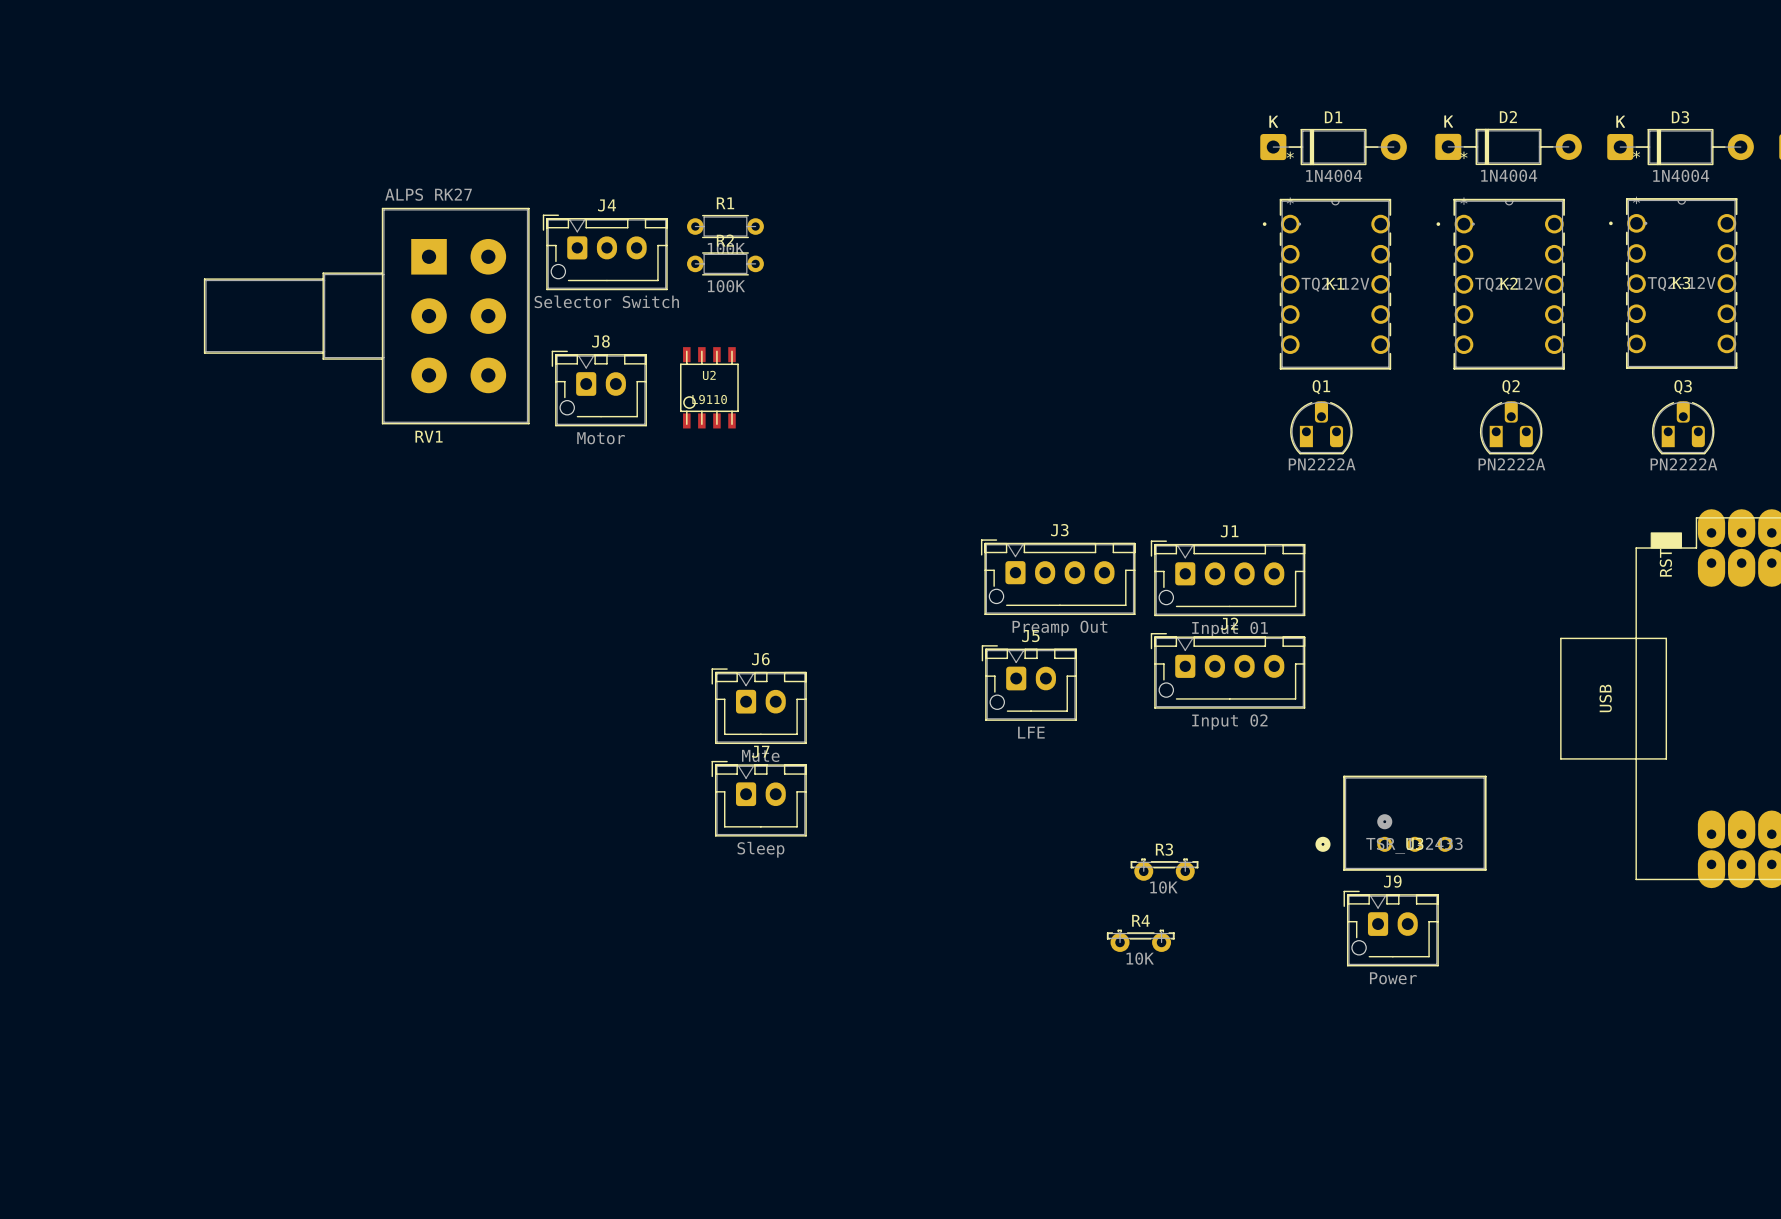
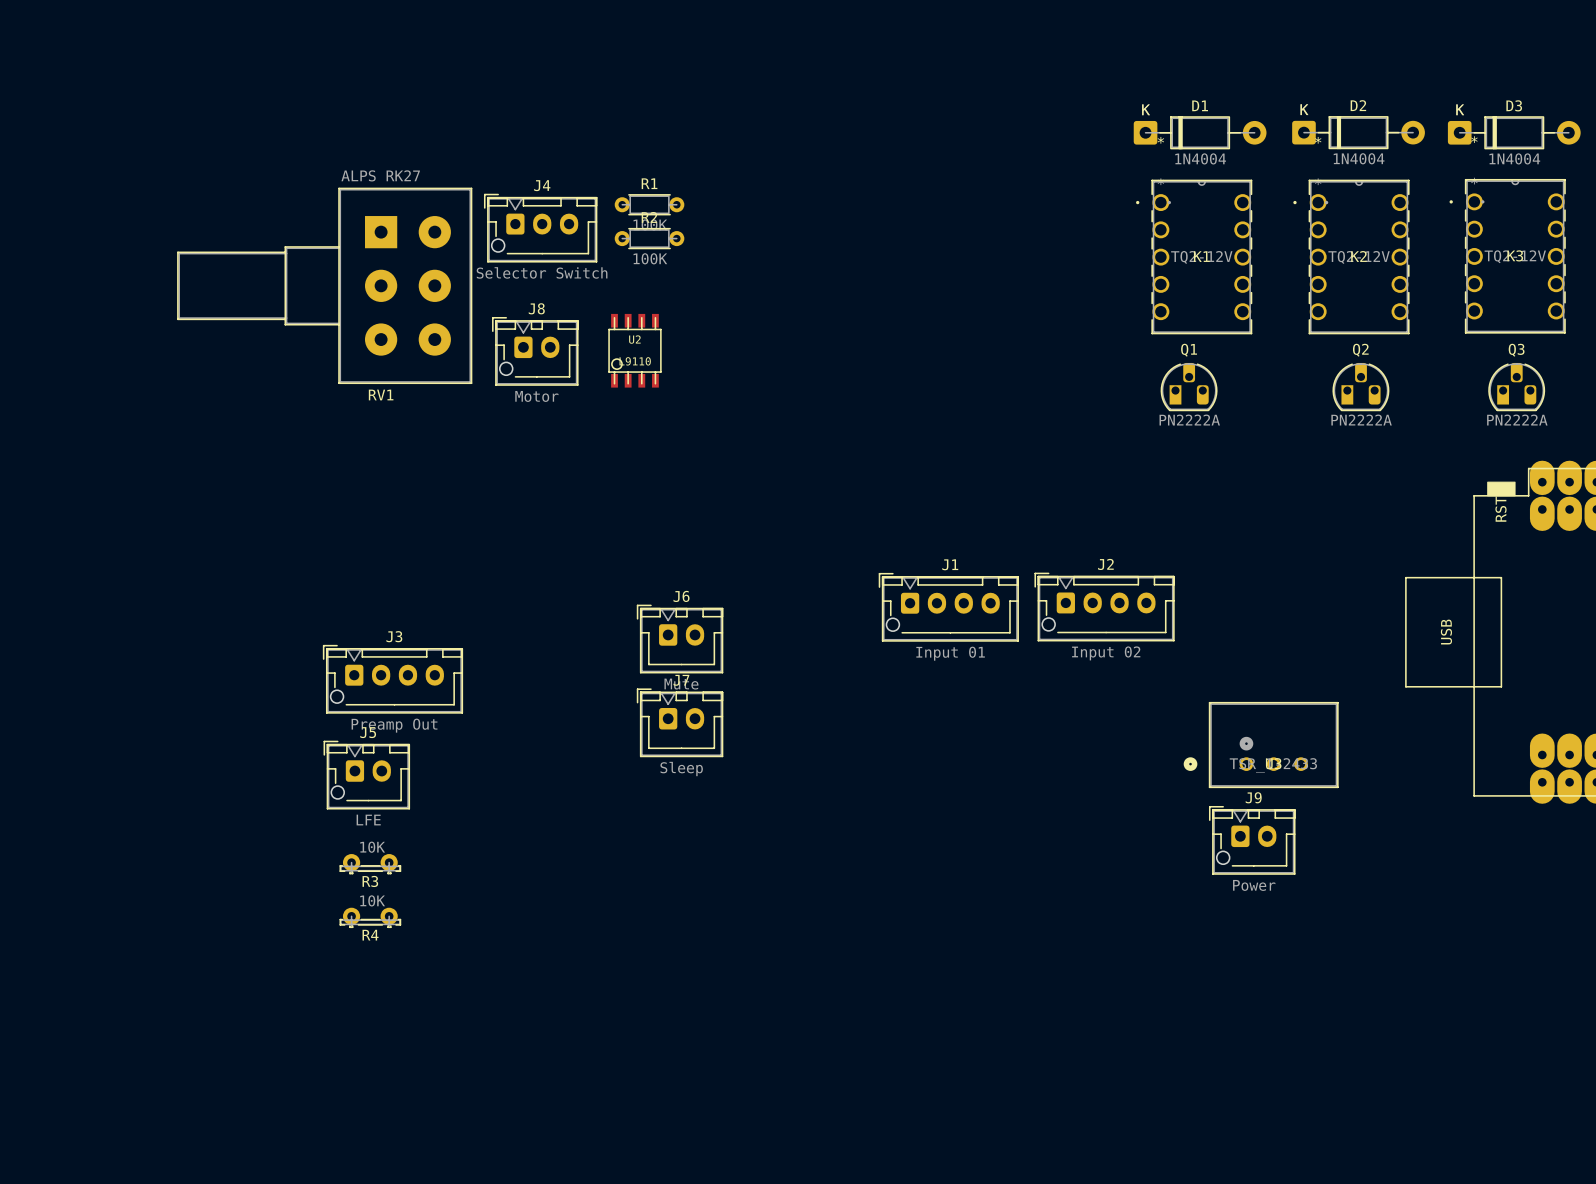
J3 position: (1058, 577) -> (392, 679)
J1 position: (1228, 578) -> (948, 607)
J5 position: (1029, 683) -> (366, 775)
R3 rotation: 0° (1164, 869) -> 180° (370, 864)
R3 position: (1164, 869) -> (370, 864)
R4 rotation: 0° (1140, 940) -> 180° (370, 917)
R4 position: (1140, 940) -> (370, 917)

